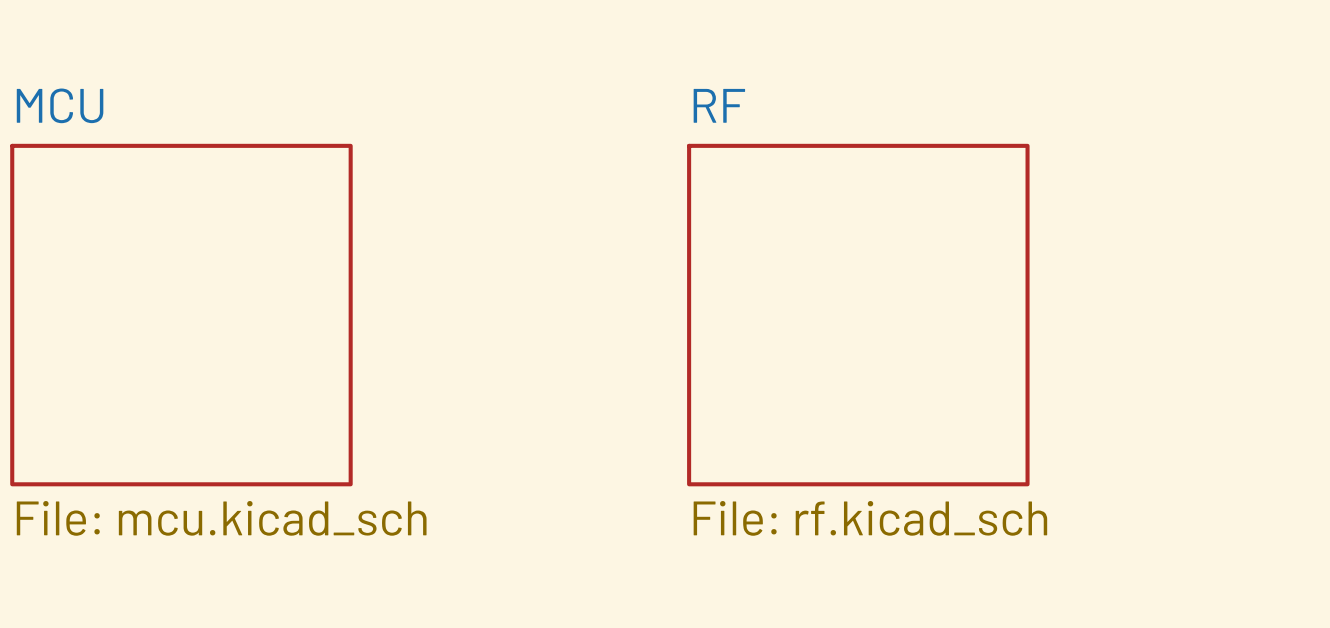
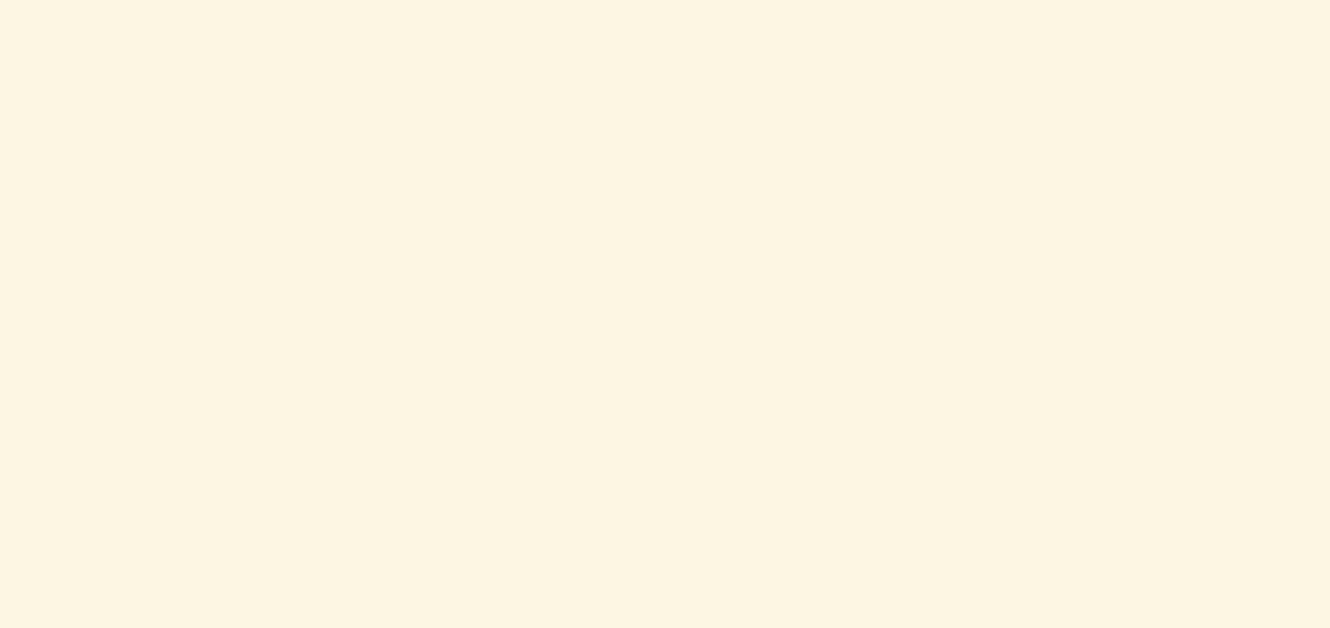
sheet MCU: File: mcu.kicad_sch (181, 315) -> none
sheet RF: File: rf.kicad_sch (858, 315) -> none

